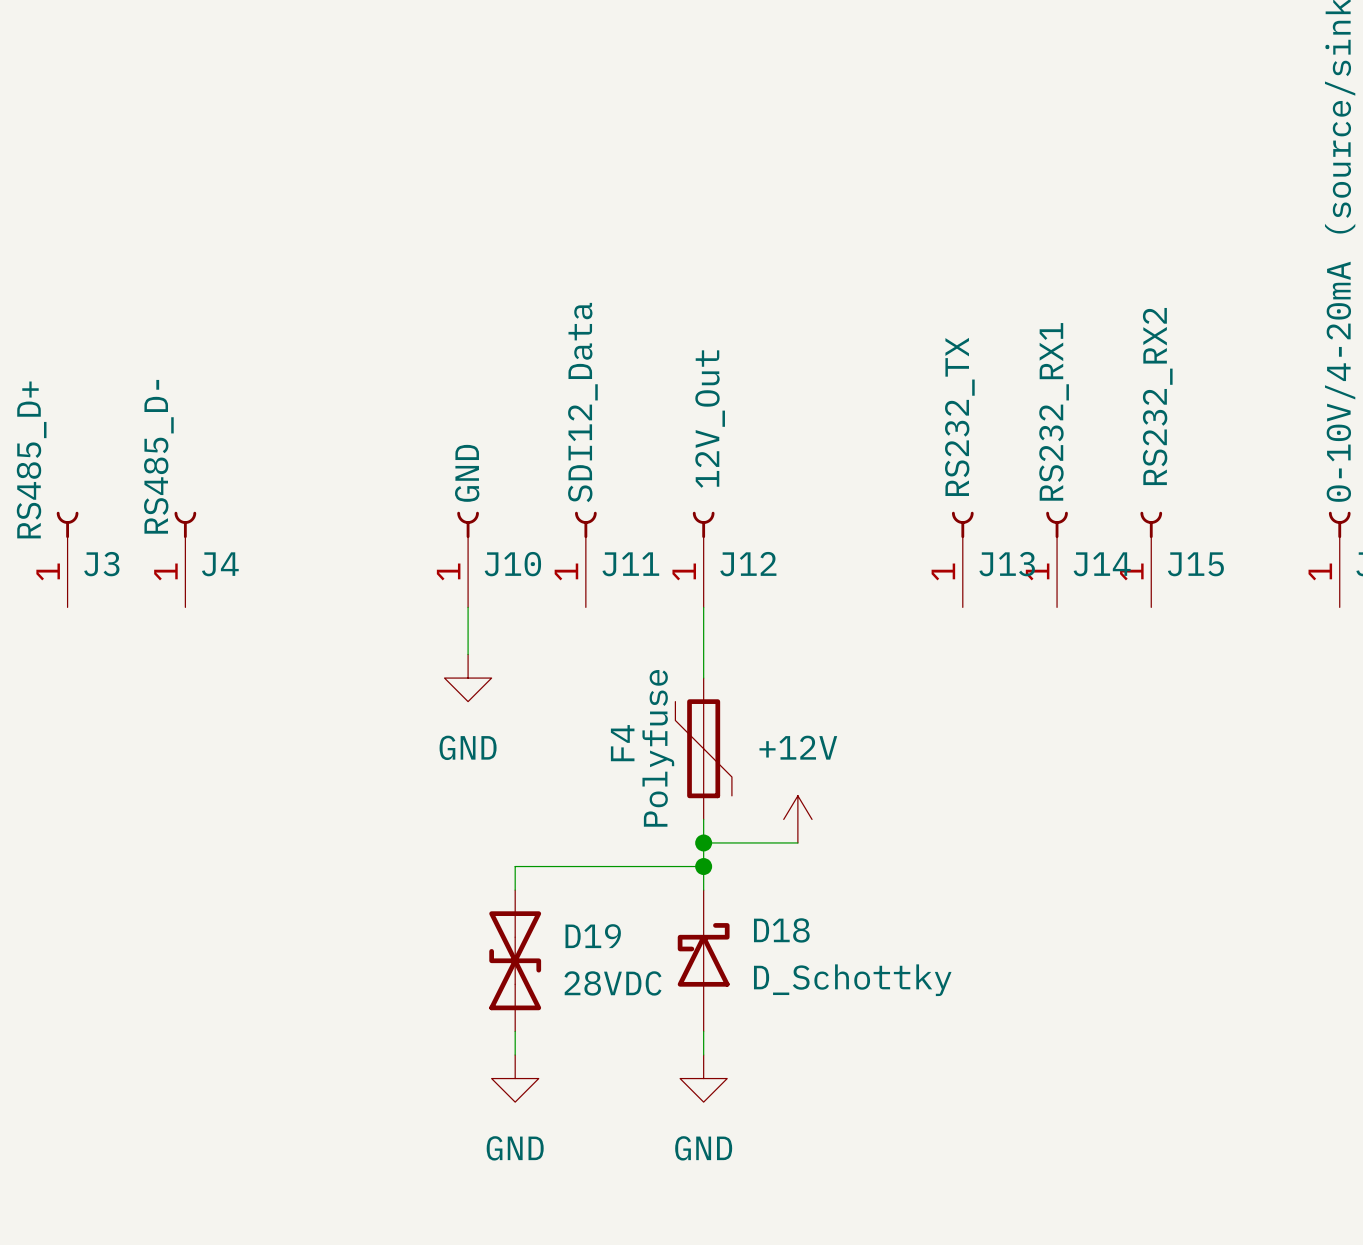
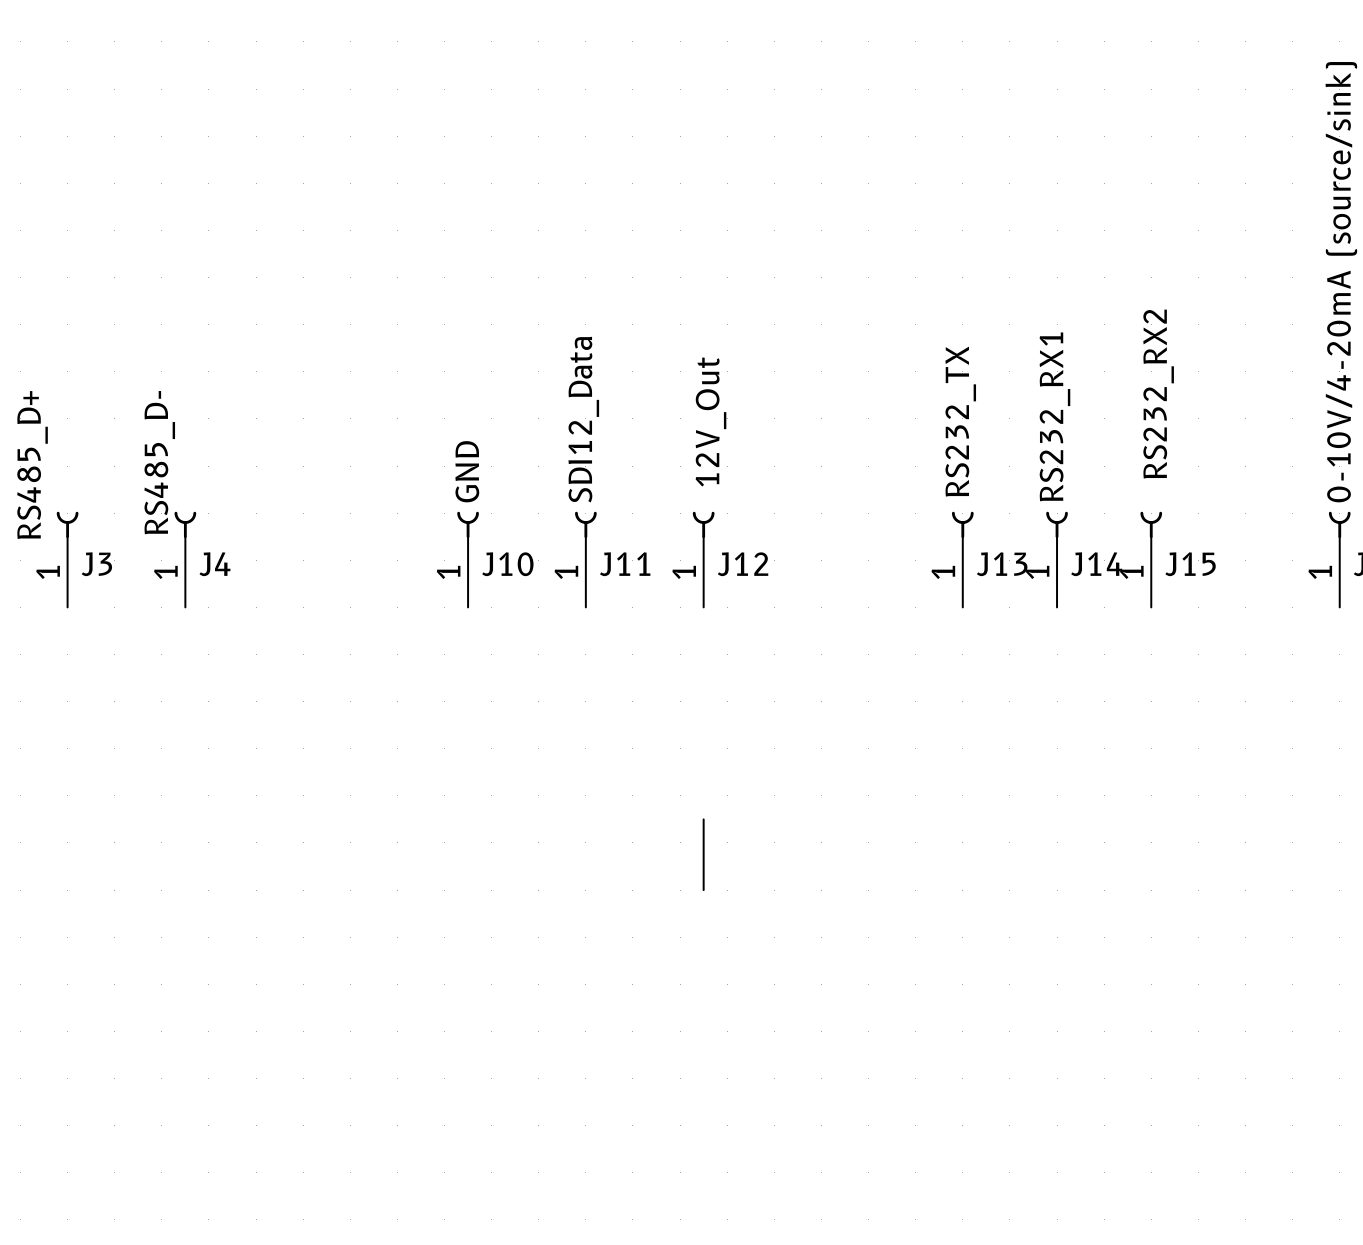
wire: (468, 607) (468, 654) -> none
wire: (703, 607) (703, 678) -> none
power symbol: GND (468, 678) -> none
F4: Polyfuse (703, 748) -> none
power symbol: +12V (797, 819) -> none
wire: (703, 842) (797, 842) -> none
junction: (703, 842) -> none
wire: (703, 866) (515, 866) (515, 890) -> none
junction: (703, 866) -> none
D19: 28VDC (515, 960) -> none
D18: D_Schottky (703, 960) -> none
wire: (515, 1031) (515, 1055) -> none
wire: (703, 1031) (703, 1055) -> none
power symbol: GND (515, 1078) -> none
power symbol: GND (703, 1078) -> none

